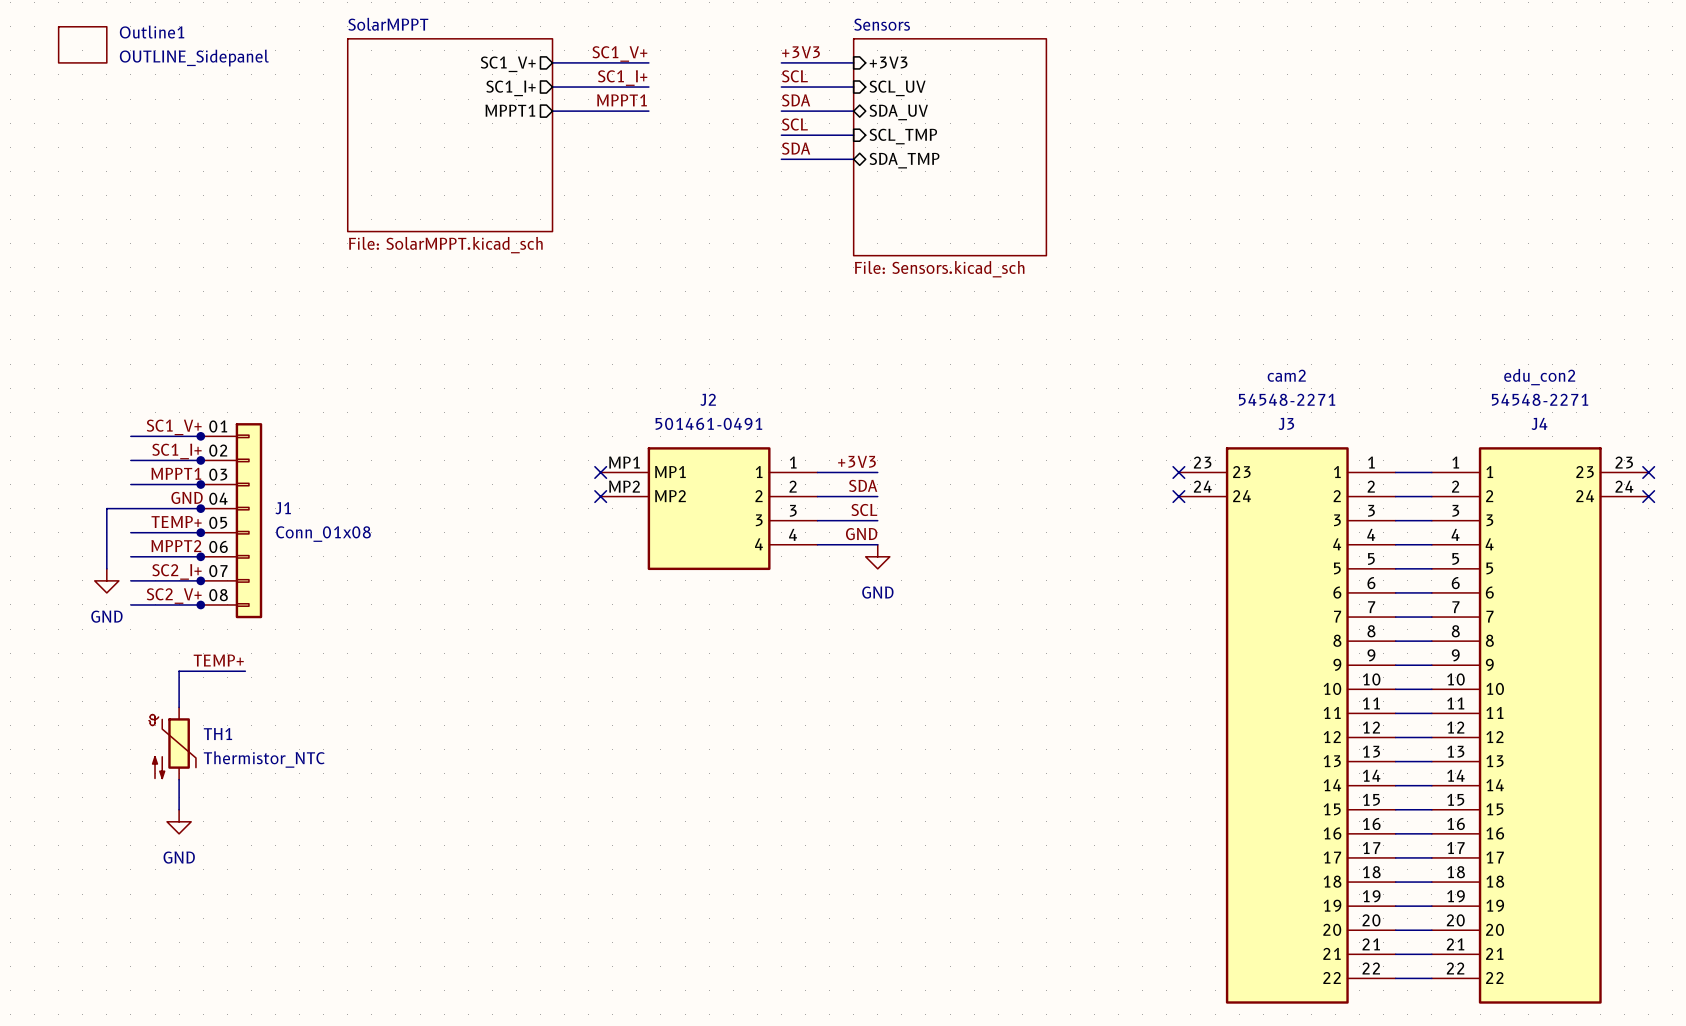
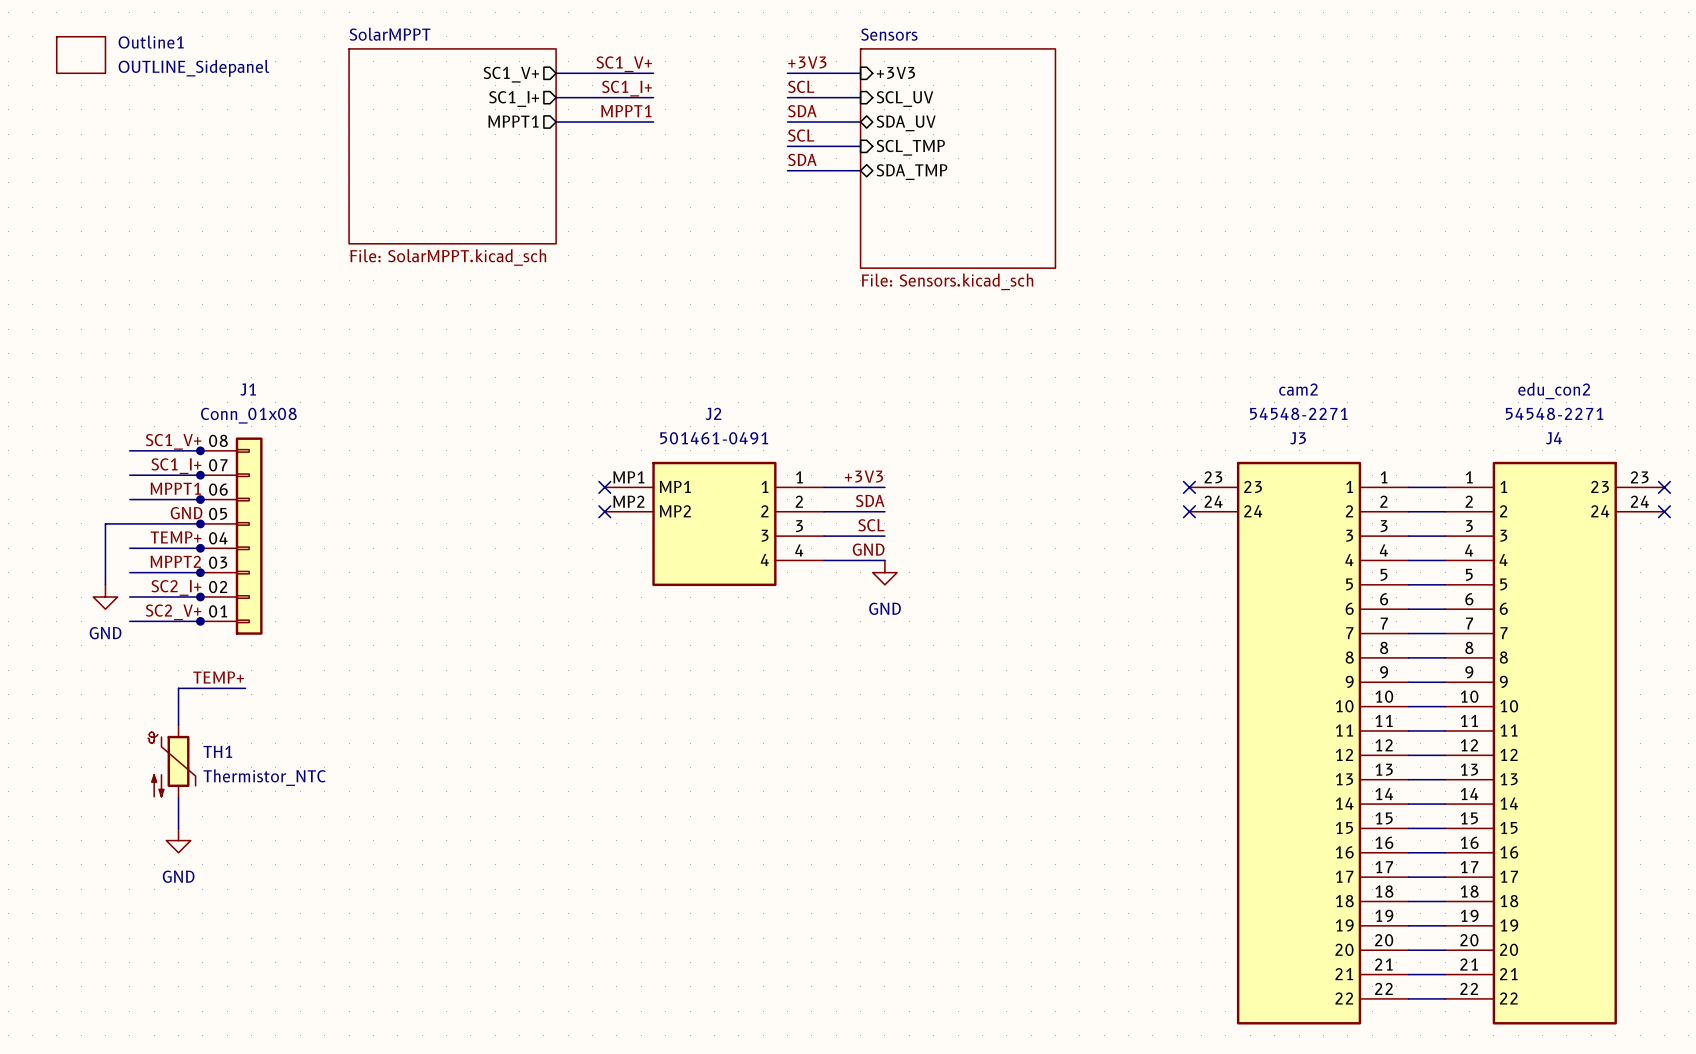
J1 name position: J1 (283, 508) -> J1 (248, 389)
J1 flip: as is (248, 520) -> up-down (249, 536)
J1 value position: Conn_01x08 (323, 534) -> Conn_01x08 (248, 415)

